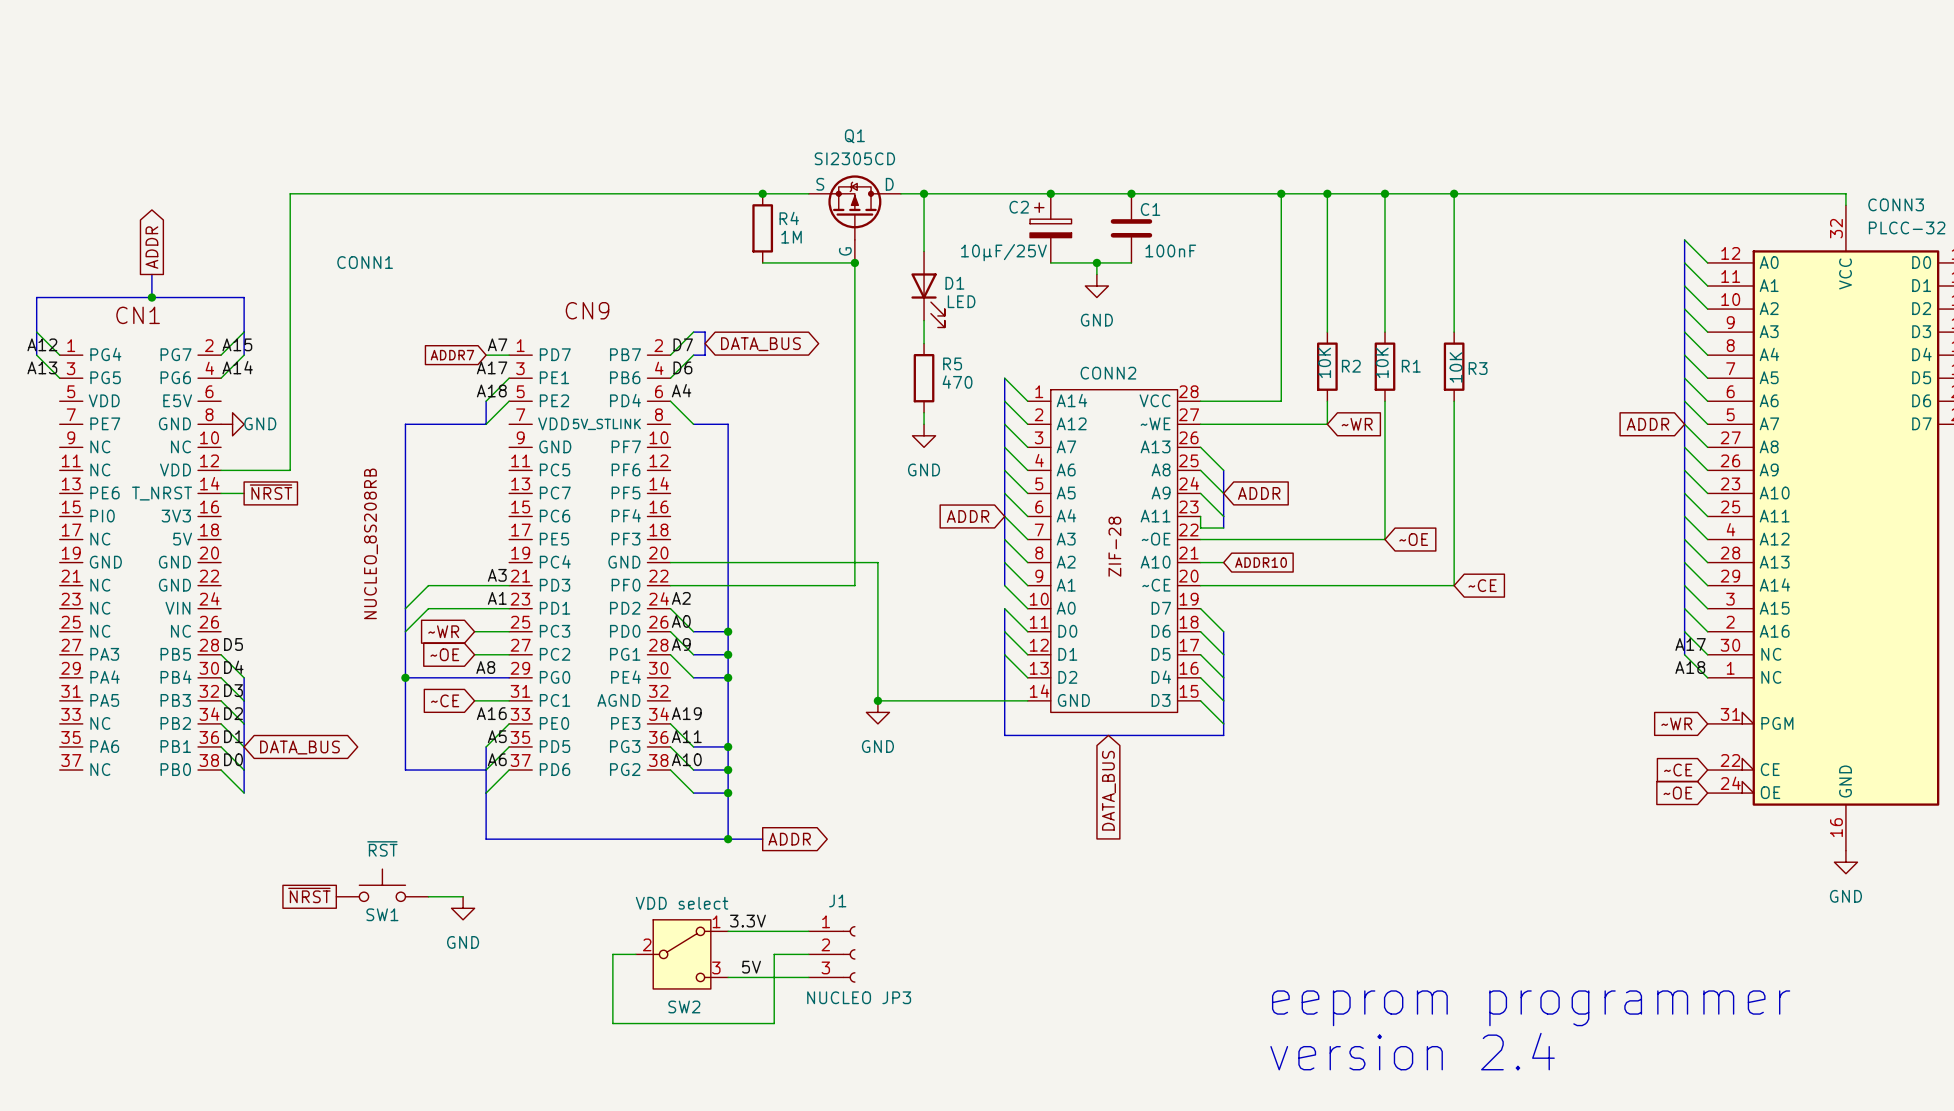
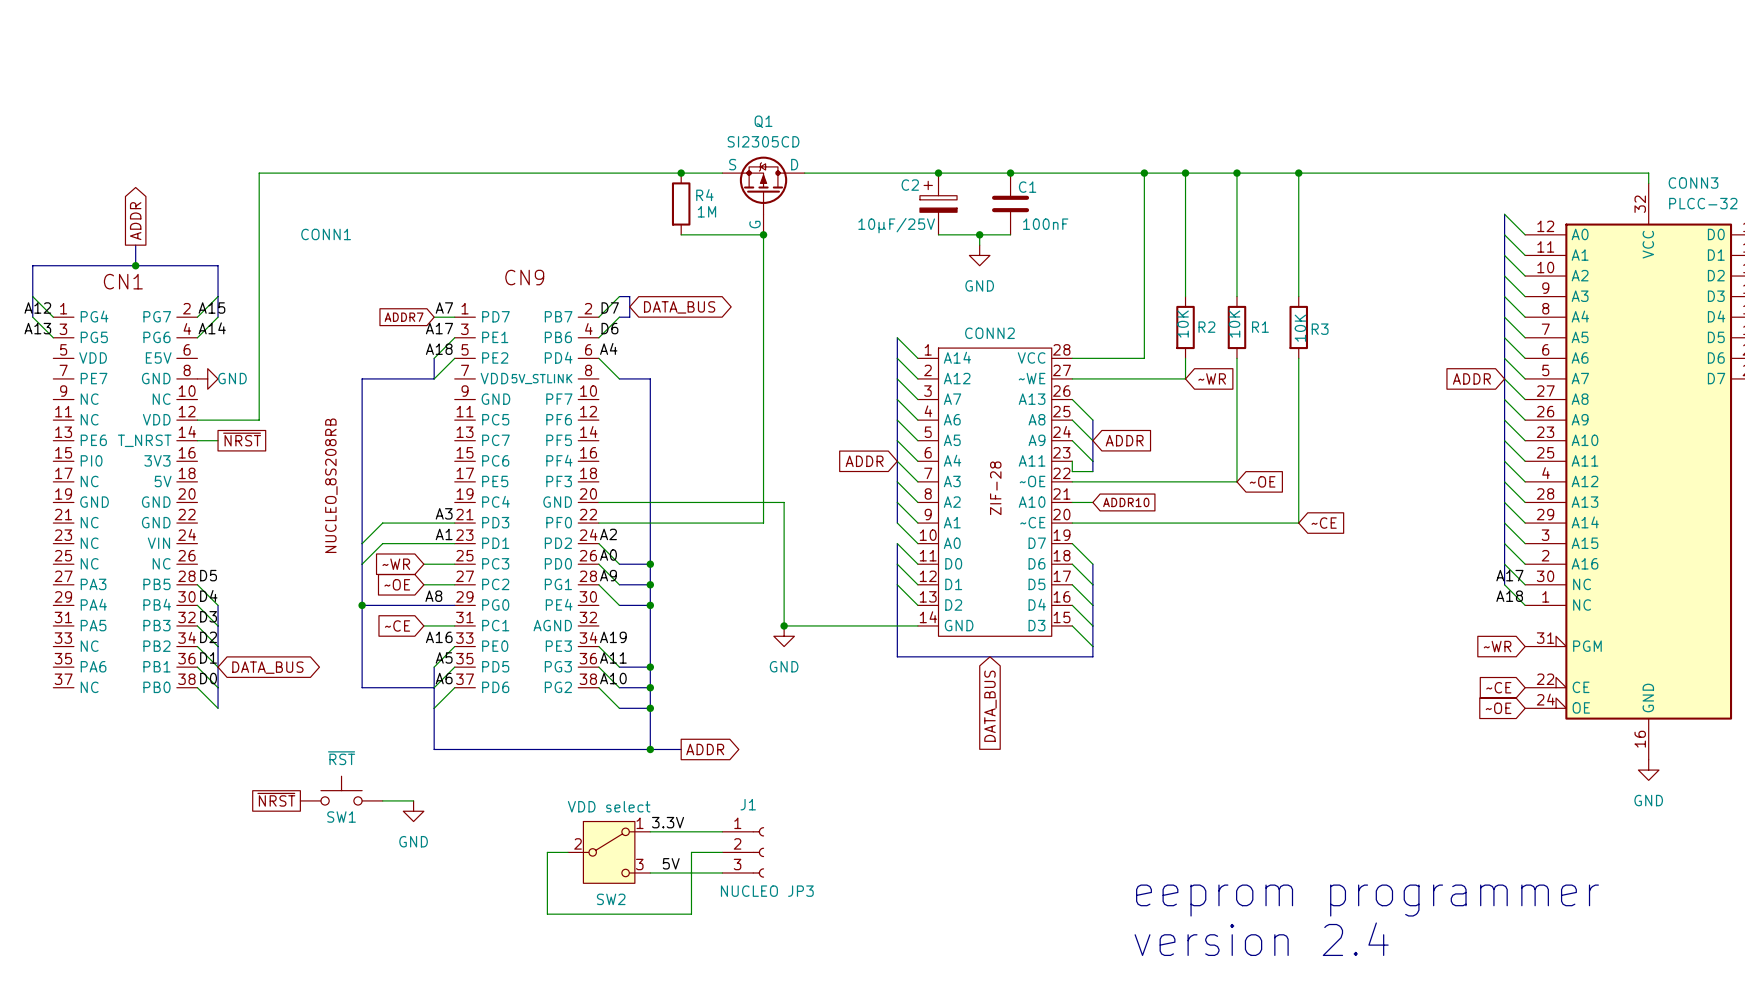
wire: (924, 193) (924, 251) -> none
junction: (924, 193) -> none
D1: LED (928, 289) -> none
wire: (924, 320) (924, 343) -> none
R5: 470 (924, 378) -> none
wire: (924, 412) (924, 424) -> none
power symbol: GND (924, 435) -> none

